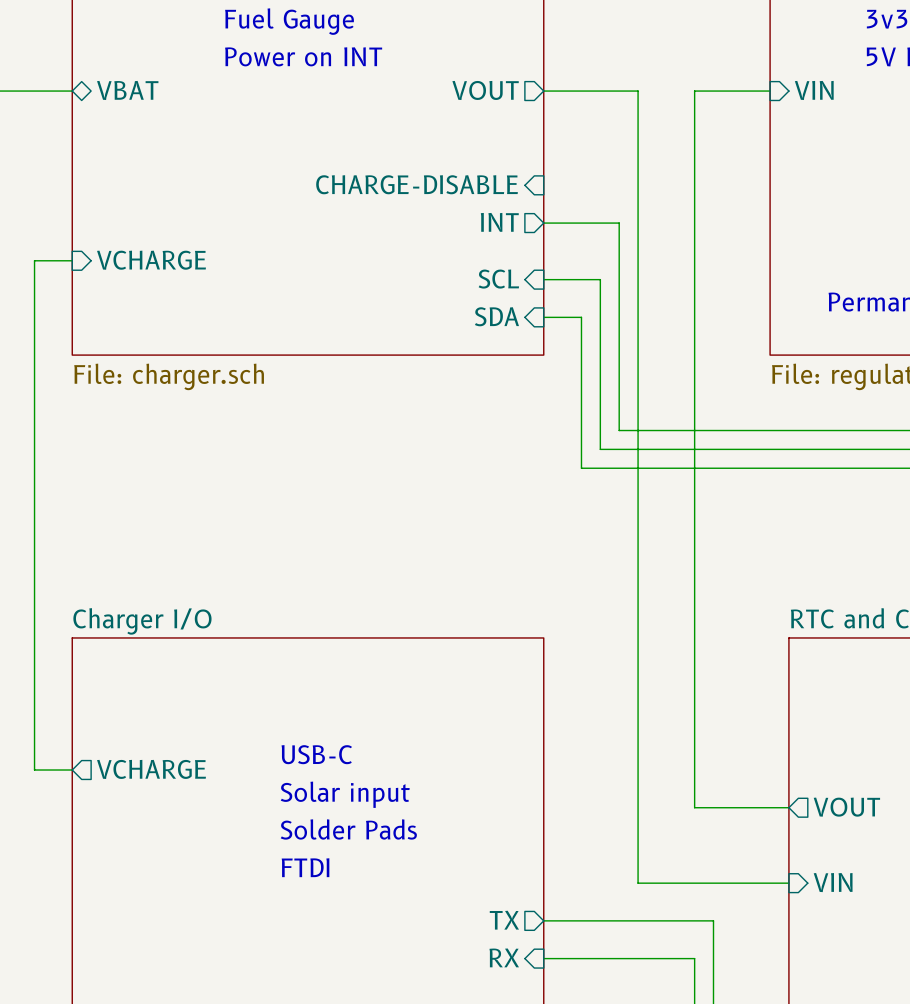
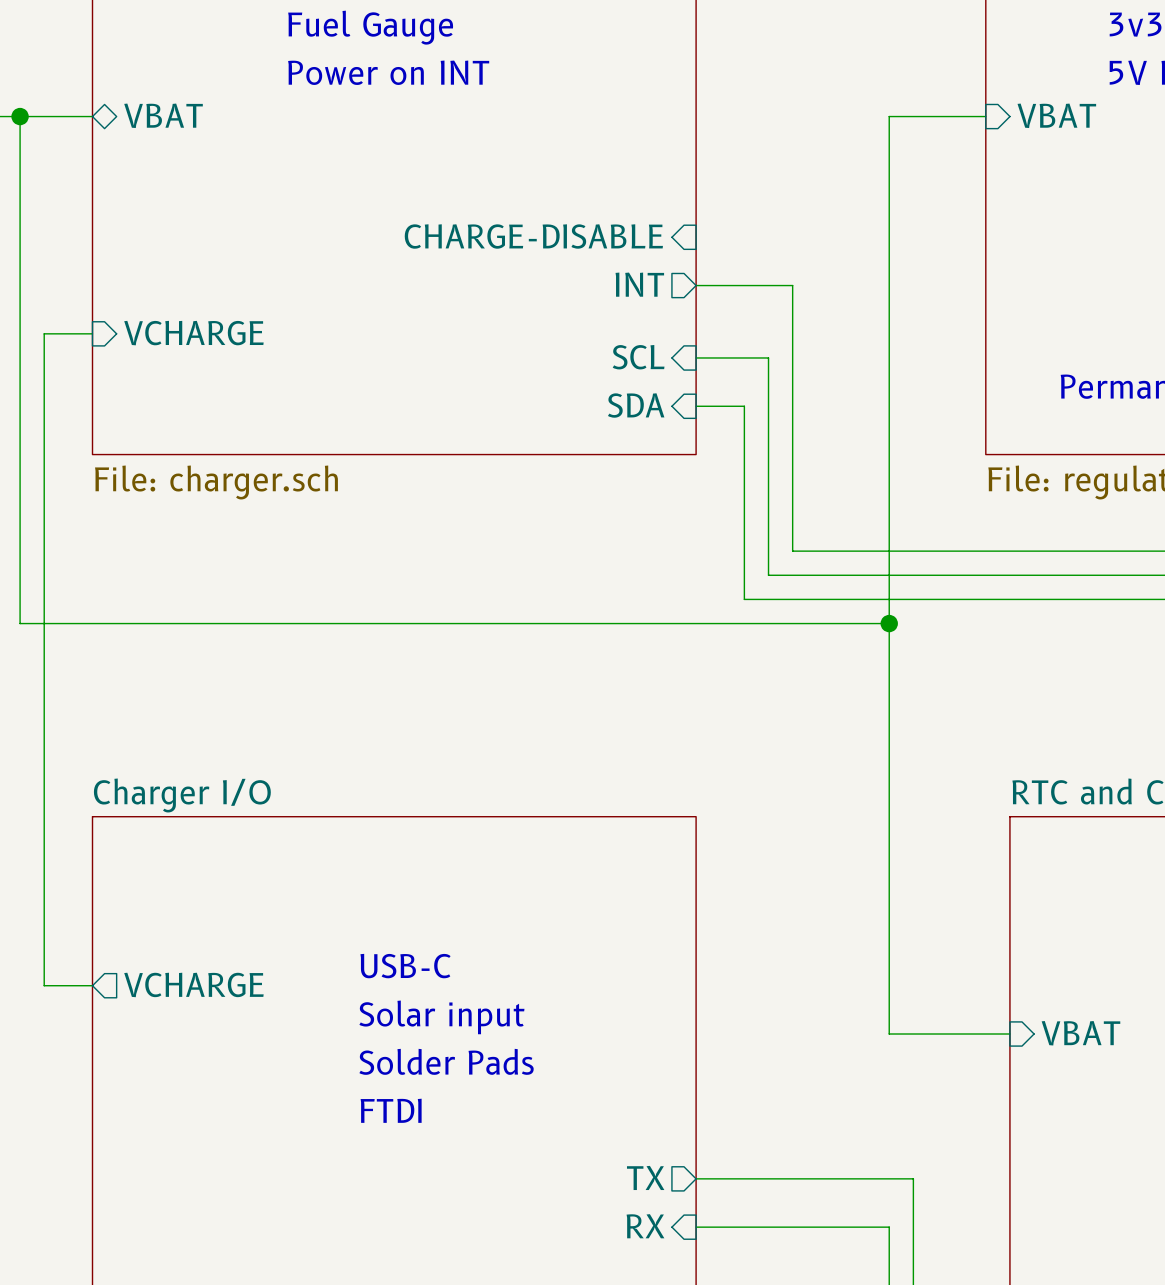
sheet pin: VOUT (485, 90) -> none
sheet pin: VIN (814, 90) -> VBAT (1056, 115)
wire: none -> (20, 116) (20, 623) (889, 623)
junction: none -> (20, 116)
wire: (543, 91) (638, 91) (638, 883) (788, 883) -> none
junction: none -> (889, 623)
sheet pin shape: output (846, 807) -> input (1080, 1033)
sheet pin: VOUT (846, 807) -> VBAT (1080, 1033)
sheet pin: VIN (833, 882) -> none

